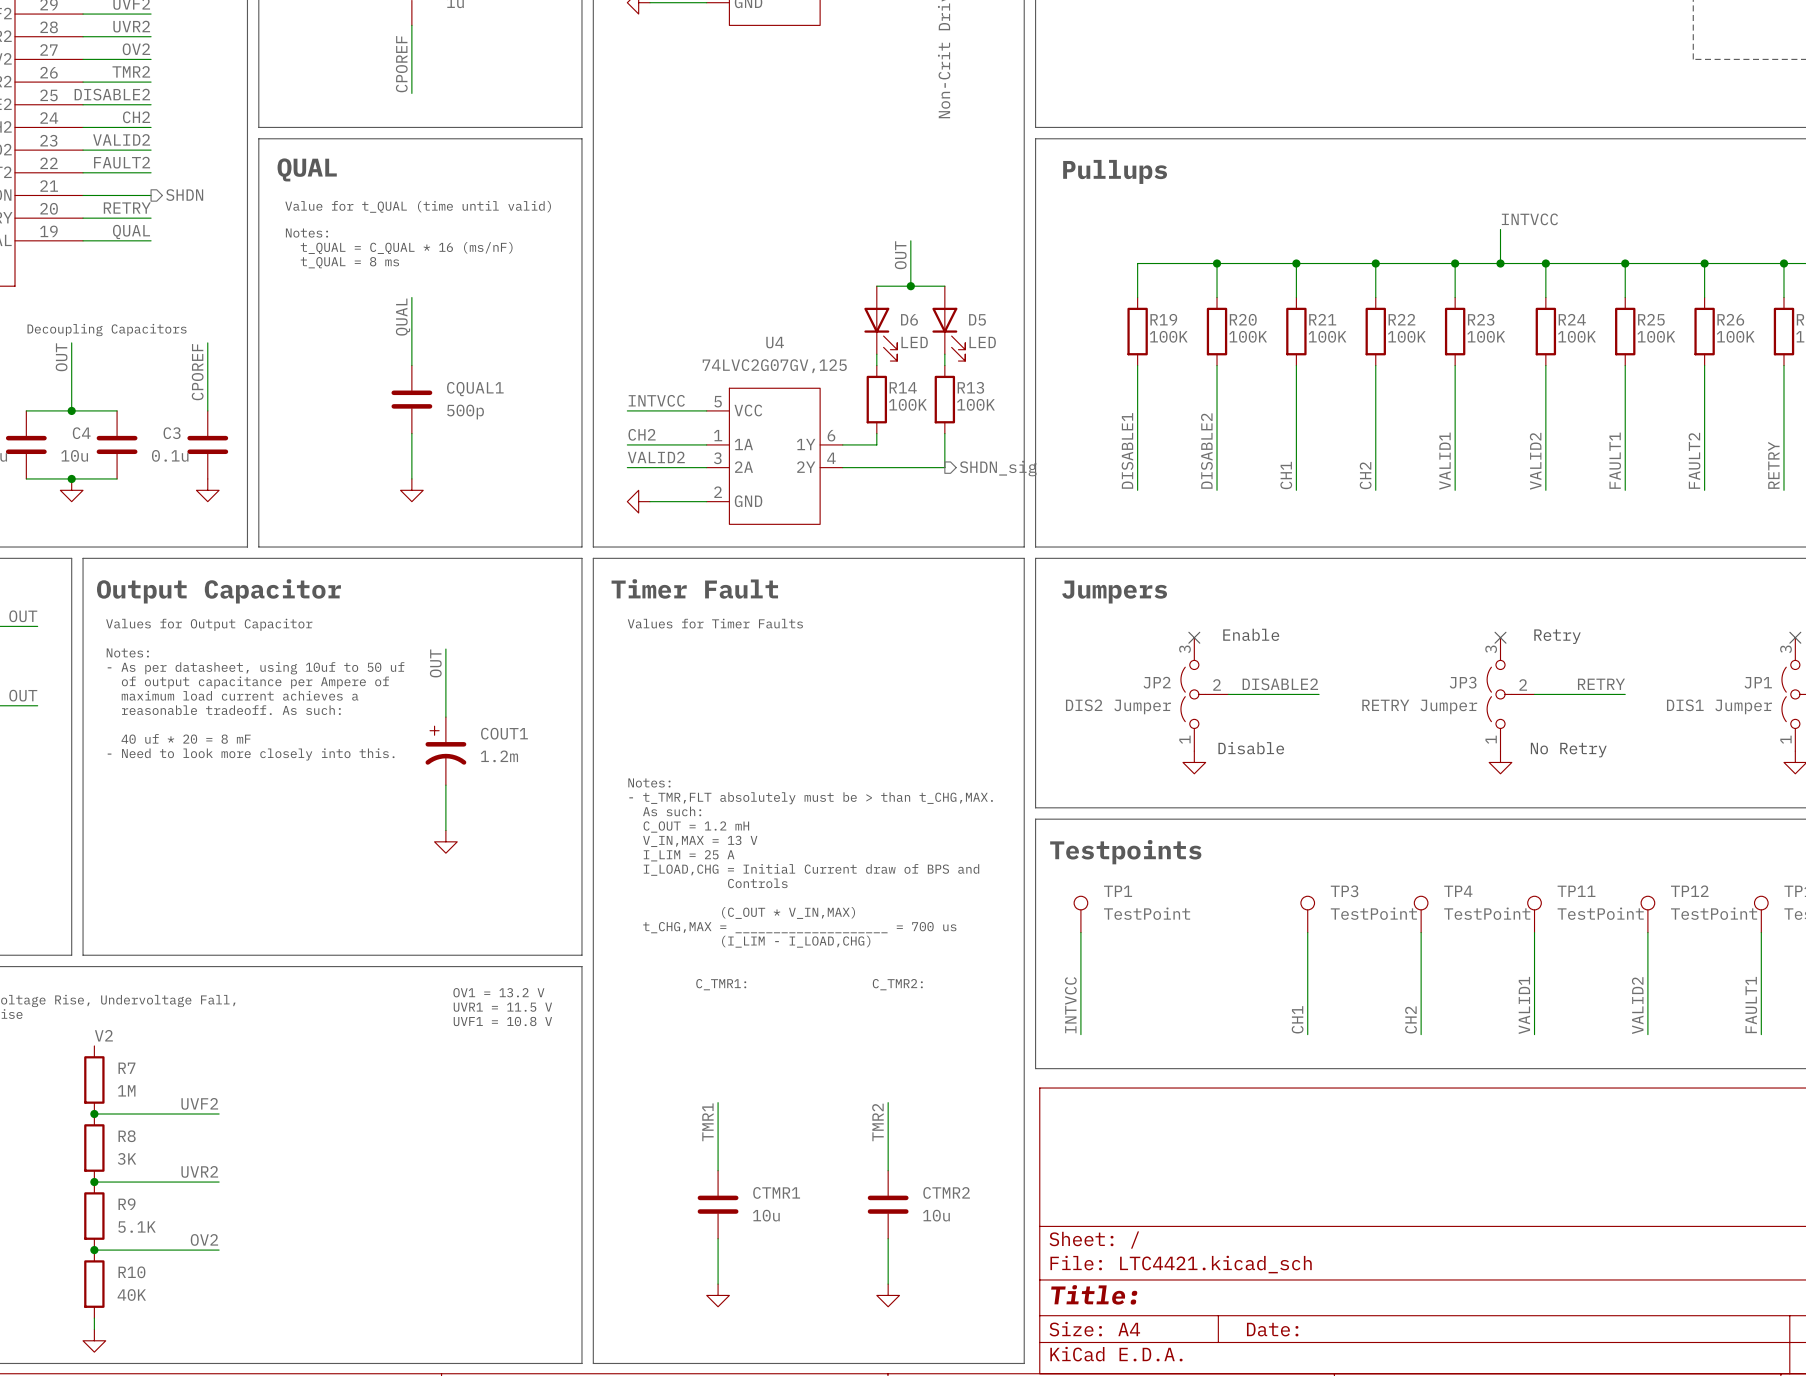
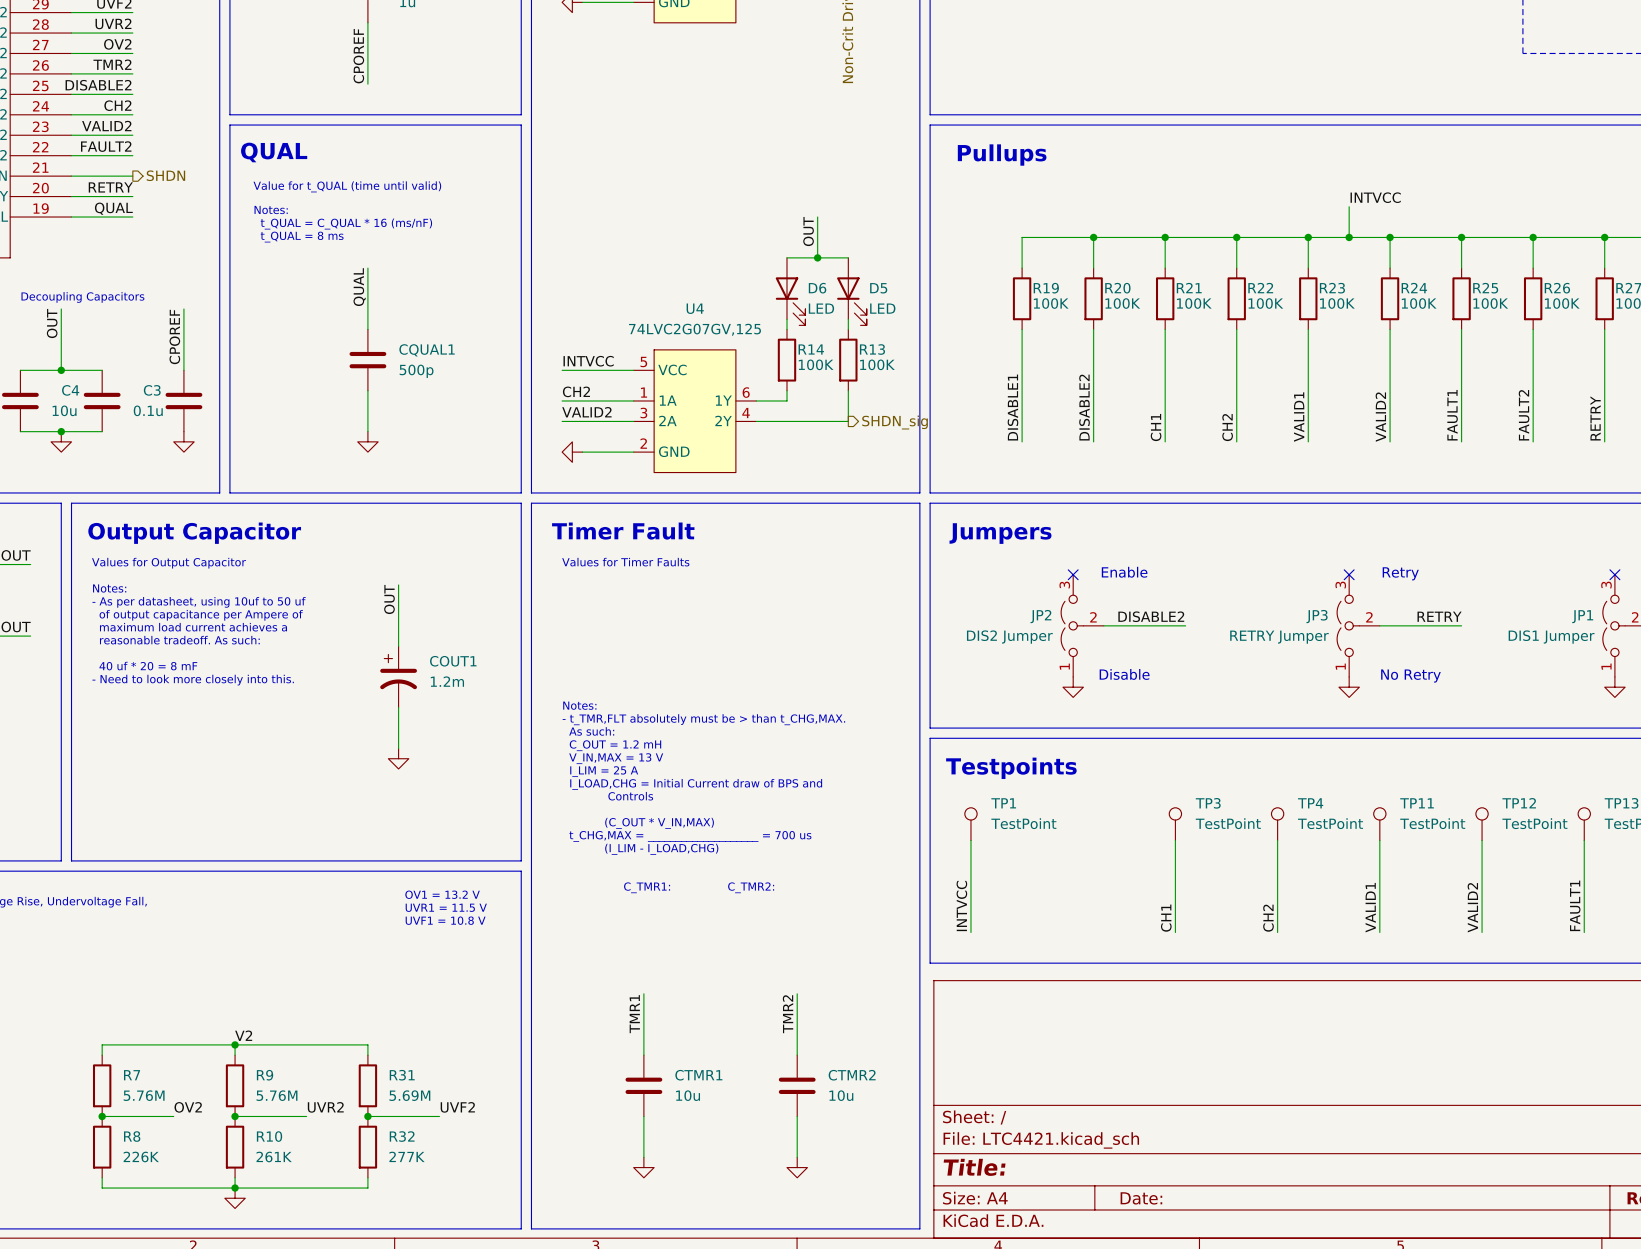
label position: V2 (103, 1035) -> V2 (243, 1035)
R7 position: (94, 1079) -> (102, 1085)
R7 value: 1M (126, 1090) -> 5.76M (144, 1095)
label: UVF2 (199, 1103) -> none
wire: (94, 1114) (219, 1114) -> none
junction: (94, 1114) -> none
R8 position: (94, 1148) -> (102, 1147)
R8 value: 3K (127, 1158) -> 226K (141, 1156)
wire: none -> (235, 1044) (235, 1055)
junction: none -> (235, 1044)
wire: none -> (102, 1055) (102, 1044) (367, 1044) (367, 1055)
label position: UVR2 (199, 1171) -> UVR2 (325, 1107)
wire: (94, 1182) (219, 1182) -> none
junction: (94, 1182) -> none
R31: none -> 5.69M (367, 1085)
R9 position: (94, 1216) -> (235, 1085)
R9 value: 5.1K (136, 1227) -> 5.76M (277, 1095)
label: none -> UVF2 (457, 1107)
wire: none -> (102, 1116) (173, 1116)
wire: none -> (235, 1116) (306, 1116)
junction: none -> (235, 1116)
wire: none -> (367, 1116) (439, 1116)
junction: none -> (367, 1116)
label position: OV2 (204, 1239) -> OV2 (188, 1107)
wire: (94, 1250) (219, 1250) -> none
junction position: (94, 1250) -> (102, 1116)
R32: none -> 277K (367, 1147)
R10 position: (94, 1284) -> (235, 1147)
R10 value: 40K (131, 1295) -> 261K (274, 1156)
wire: none -> (102, 1177) (102, 1188) (367, 1188) (367, 1177)
wire: (94, 1318) (94, 1329) -> (235, 1177) (235, 1188)
junction: none -> (235, 1188)
power symbol: none -> (235, 1198)
power symbol: (94, 1340) -> none

